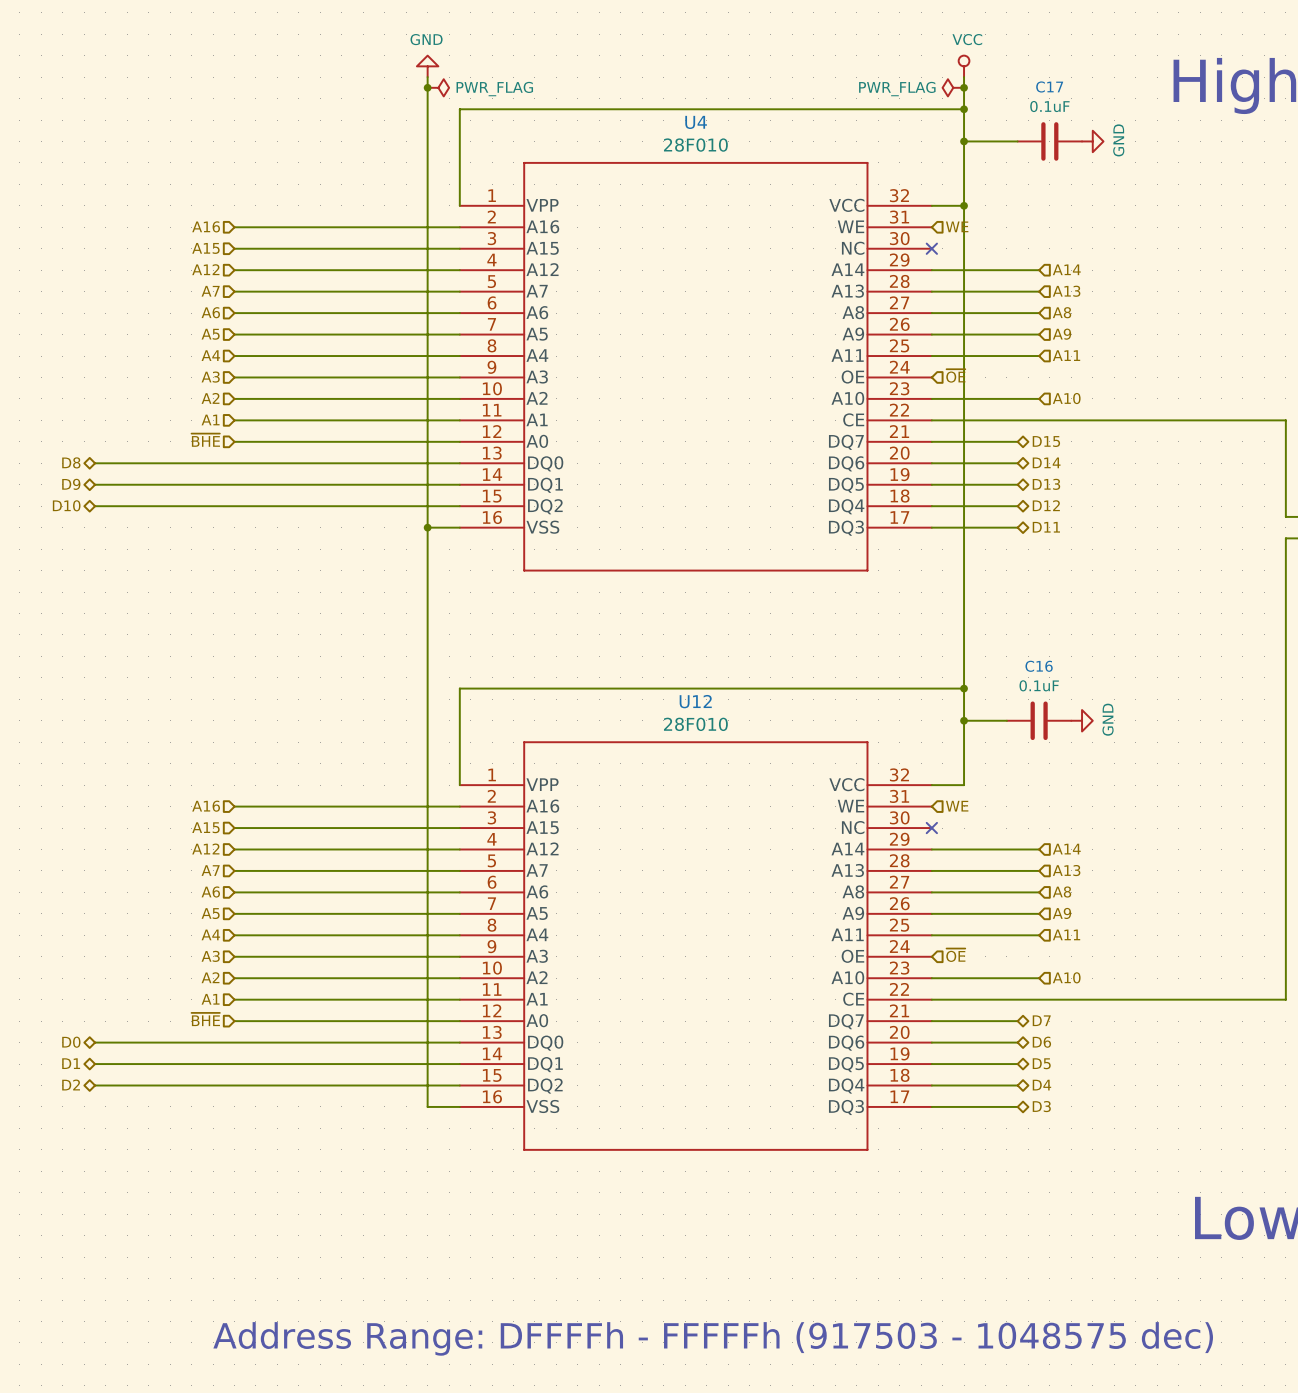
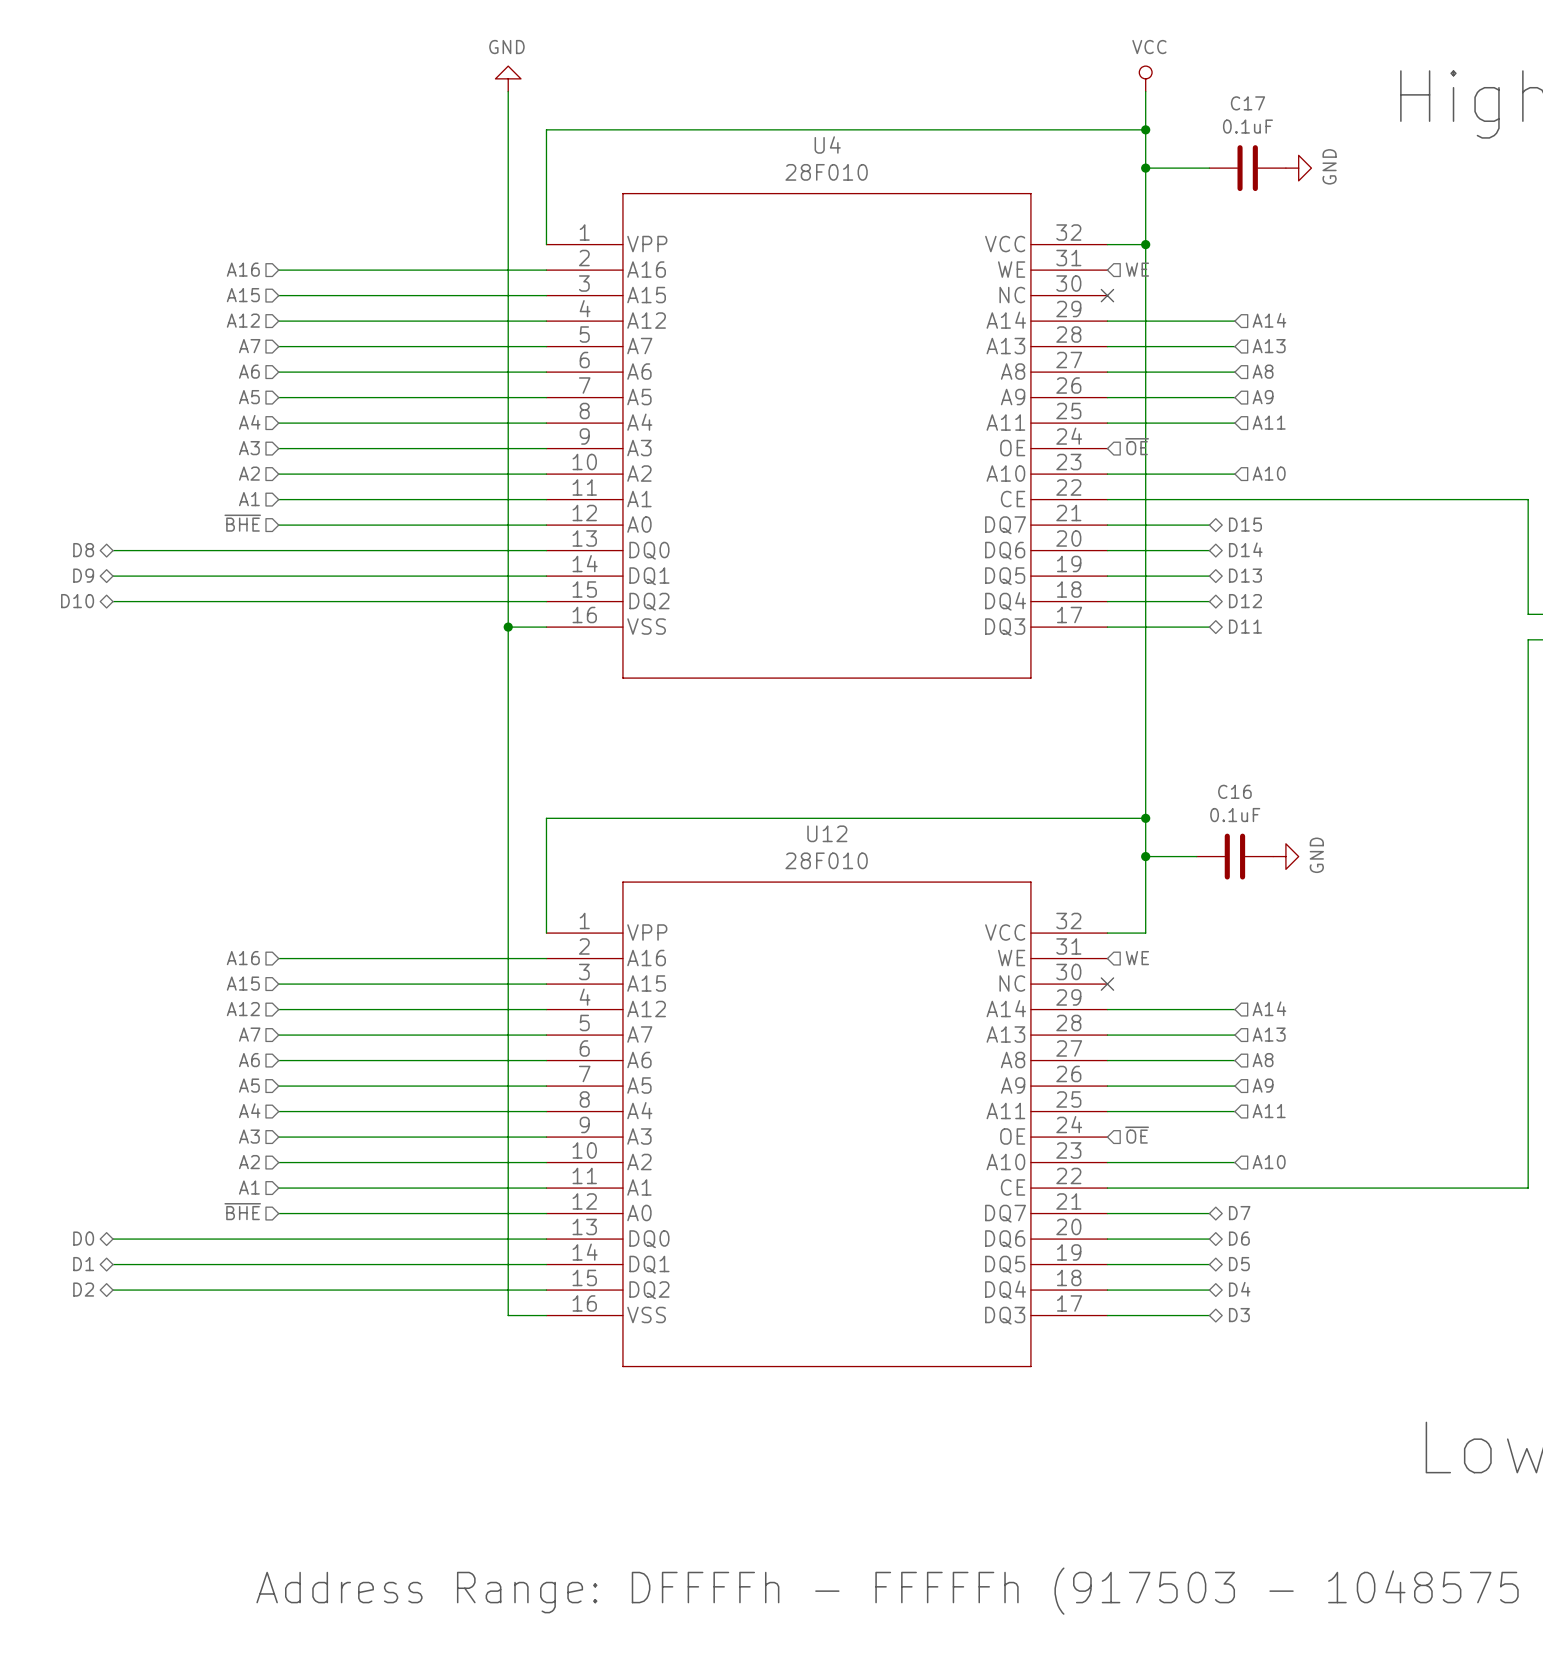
junction: (427, 87) -> none
power symbol: PWR_FLAG (438, 87) -> none
power symbol: PWR_FLAG (953, 87) -> none
junction: (964, 87) -> none

